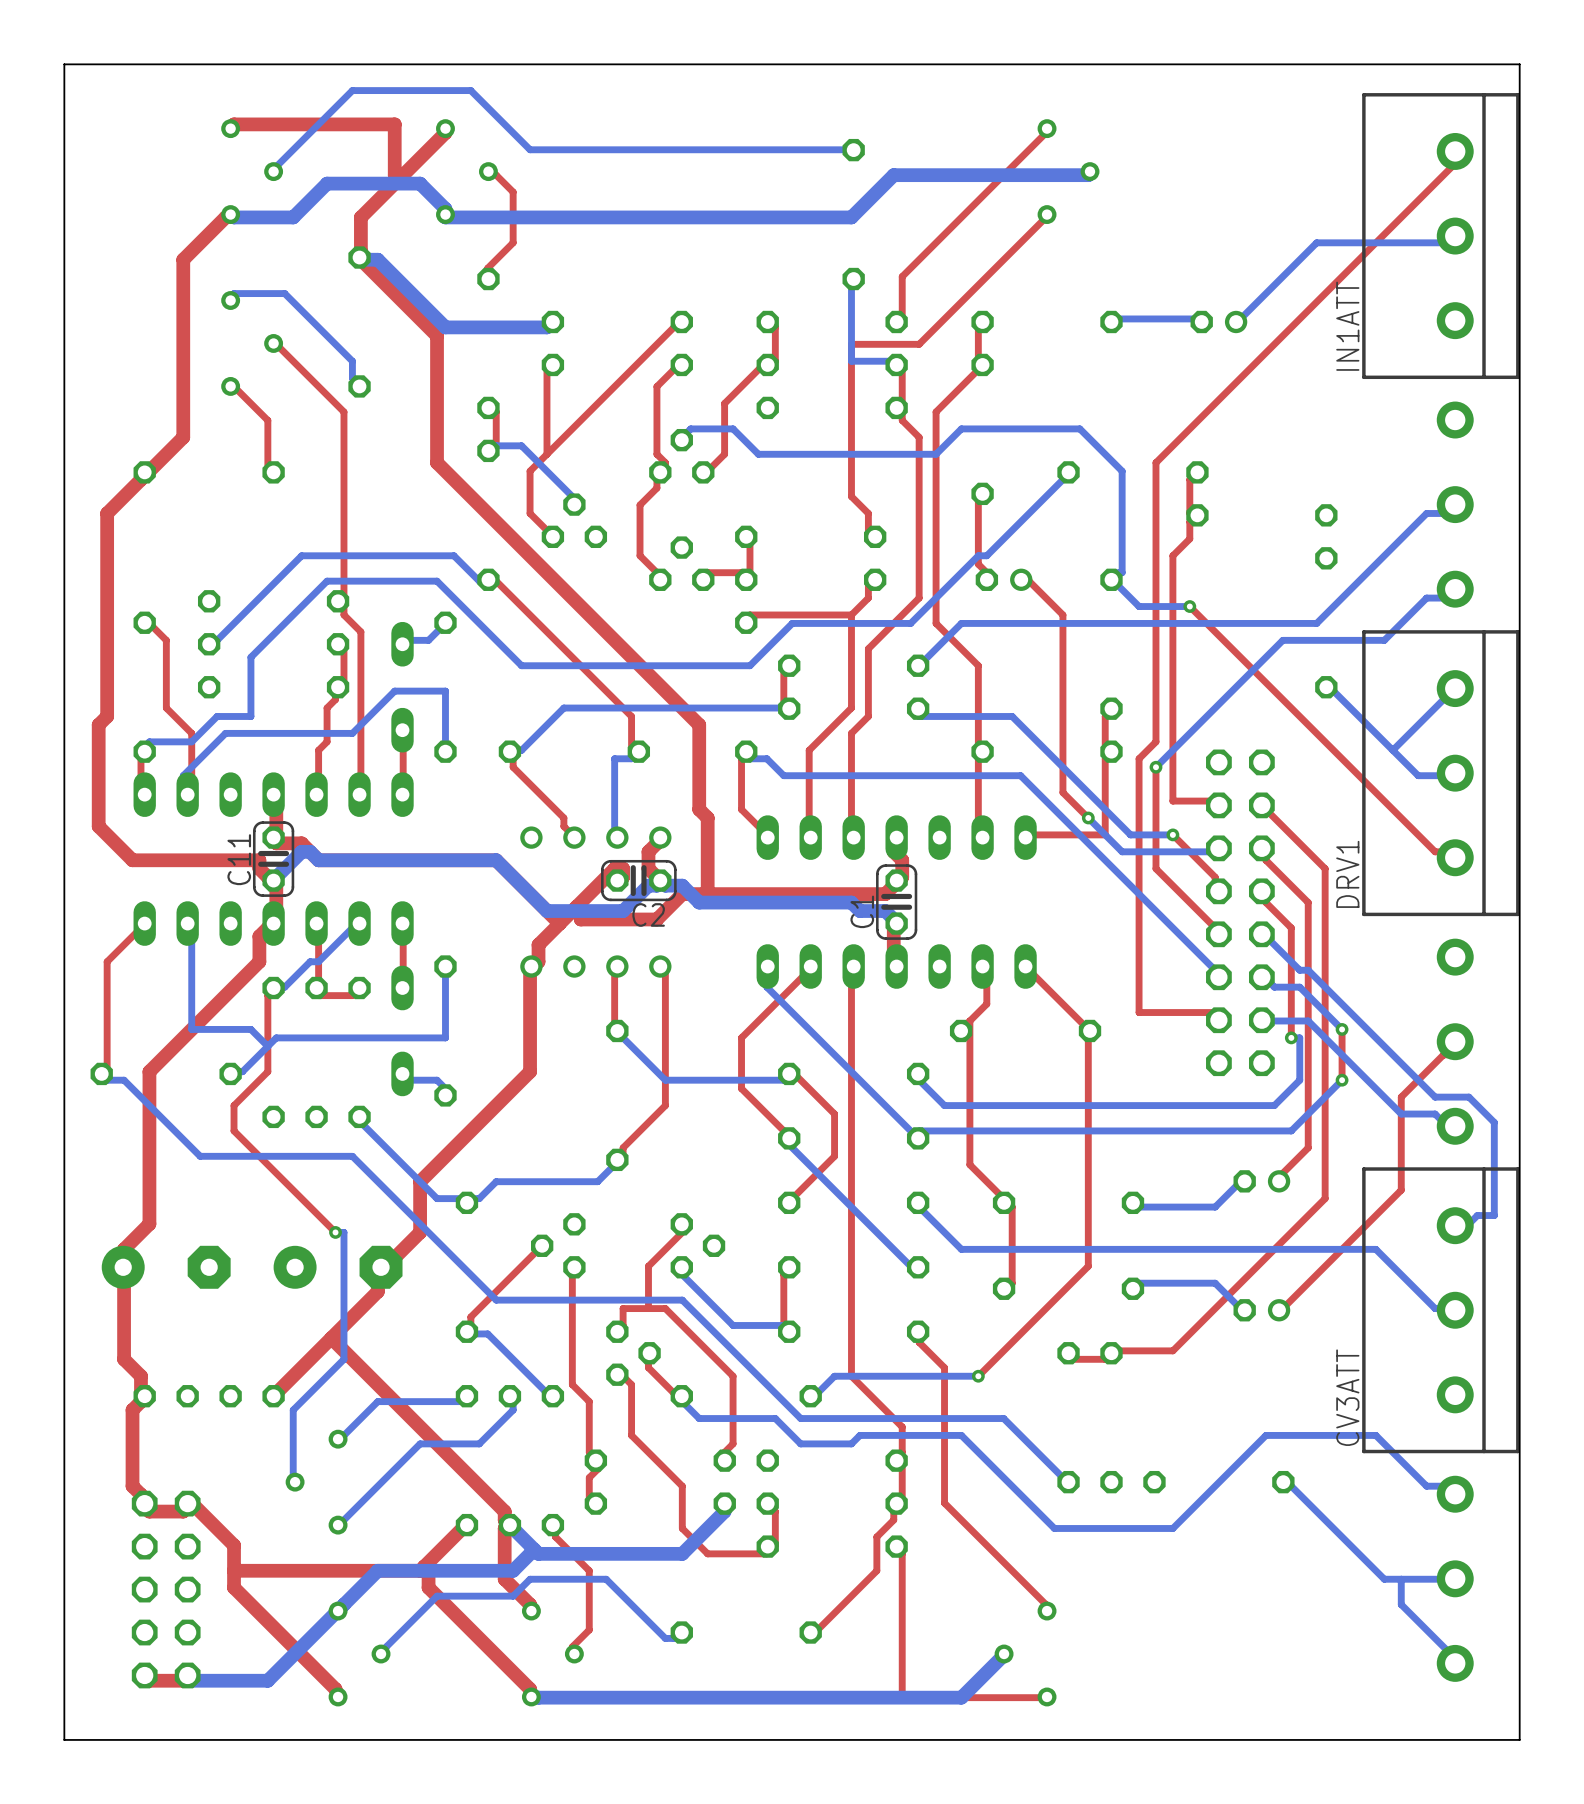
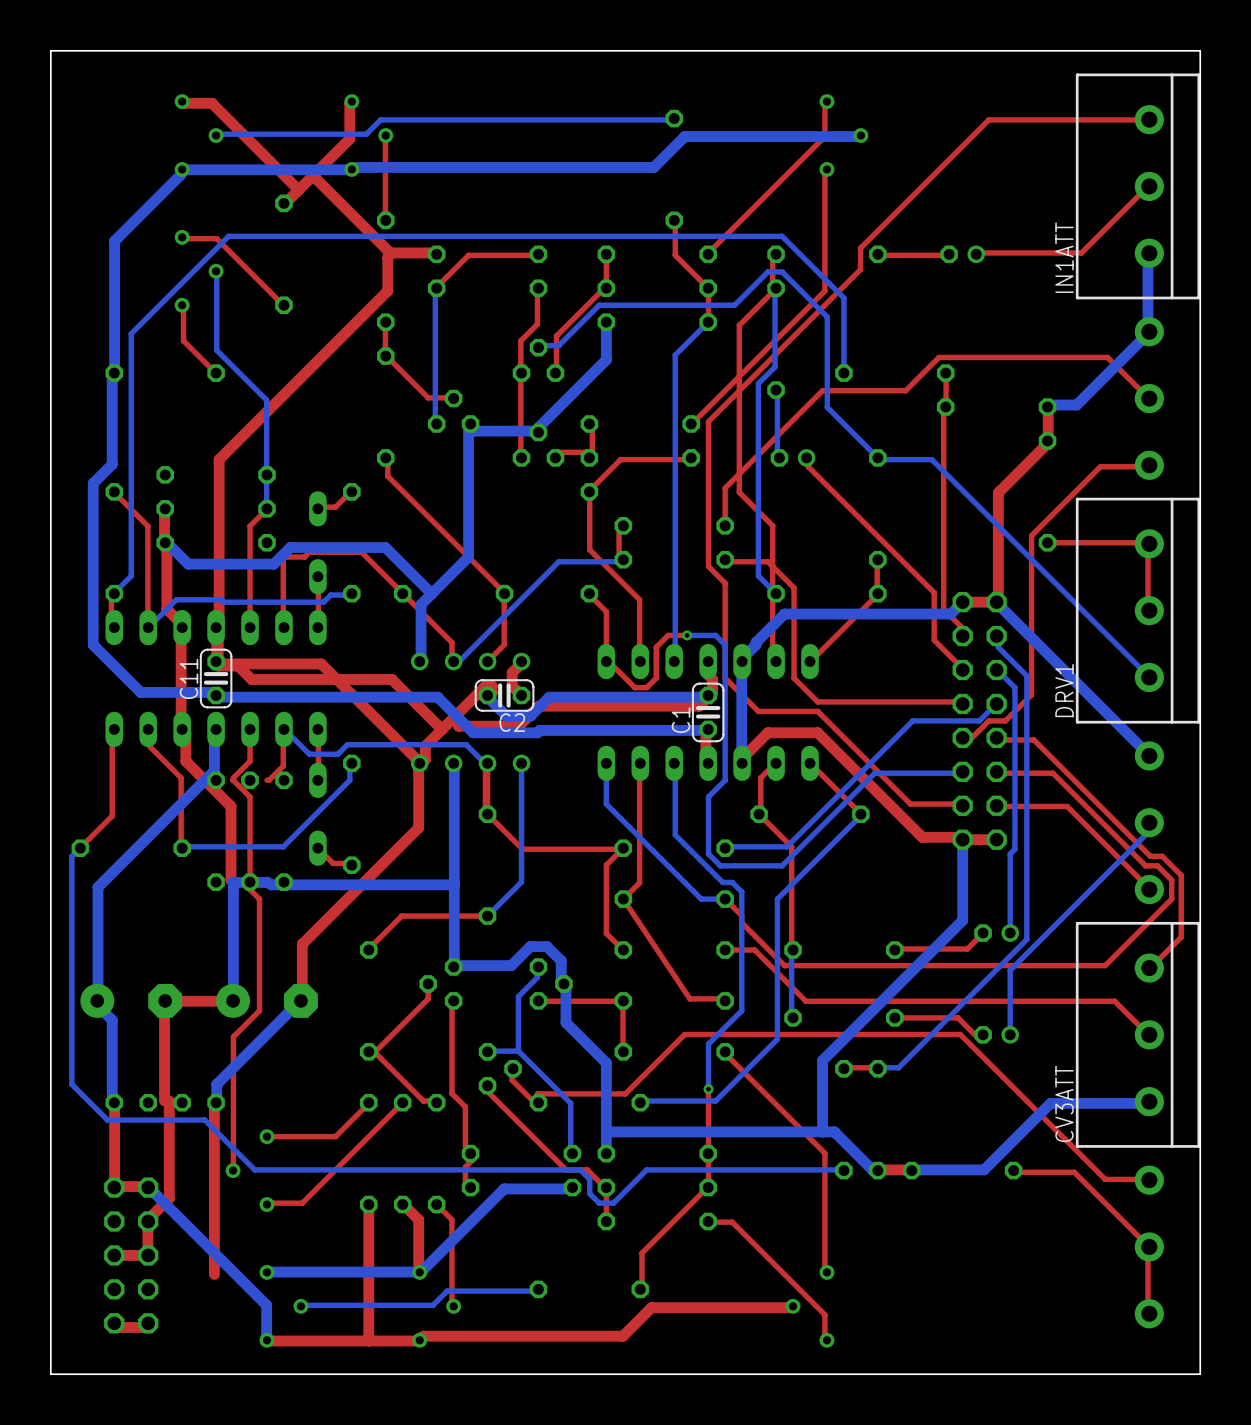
top track: (230, 128) (234, 124) (394, 124) (394, 175) (398, 179) -> (182, 101) (183, 103) (212, 103) (298, 190)
top track: (445, 128) (445, 132) (360, 217) (359, 257) (437, 335) (437, 462) (699, 724) (699, 809) (707, 817) (707, 894) -> (351, 101) (349, 103) (349, 138) (283, 203)
top track: (1047, 128) (1046, 132) (902, 276) (902, 318) (896, 321) -> (826, 101) (824, 103) (824, 136) (708, 254)
bottom track: (853, 150) (530, 149) (470, 90) (352, 90) (273, 171) -> (674, 118) (380, 119) (366, 134) (216, 135)
top track: (1455, 151) (1452, 158) (1452, 166) (1155, 462) (1155, 741) (1139, 758) (1139, 1012) (1215, 1012) (1218, 1020) -> (1149, 119) (988, 119) (860, 248) (860, 269) (708, 421) (708, 566) (725, 583) (725, 678) (758, 711) (817, 711) (910, 804) (962, 804) (962, 805)
top track: (488, 171) (496, 175) (513, 192) (513, 242) (487, 268) (488, 279) -> (385, 135) (385, 220)
bottom track: (1090, 171) (1088, 175) (893, 175) (851, 217) (445, 217) (445, 208) (420, 183) (327, 183) (293, 217) (234, 217) (230, 214) -> (860, 135) (684, 136) (653, 167) (182, 169) (181, 174) (114, 241) (112, 464) (93, 483) (93, 644) (140, 692) (212, 692) (216, 697) (437, 697) (473, 732) (708, 729)
top track: (230, 214) (183, 259) (183, 437) (149, 471) (144, 472) (140, 479) (107, 513) (107, 716) (98, 724) (98, 826) (132, 860) (259, 860) (259, 868) (273, 880) (276, 885) (276, 919) (259, 936) (259, 961) (149, 1071) (149, 1223) (124, 1249) (123, 1267) (124, 1359) (140, 1376) (140, 1393) (144, 1396) (132, 1410) (132, 1486) (140, 1494) (140, 1503) (144, 1503) (149, 1511) (183, 1511) (187, 1503) (191, 1503) (234, 1545) (234, 1587) (335, 1689) (338, 1696) -> (793, 1306) (651, 1307) (622, 1336) (423, 1336) (418, 1340) (267, 1340)
top track: (1047, 214) (919, 344) (851, 344) (851, 496) (868, 513) (868, 530) (875, 536) -> (826, 169) (824, 169) (824, 290) (691, 423)
top track: none -> (312, 175) (390, 252)
top track: none -> (1149, 186) (1081, 252) (976, 254)
bottom track: (1455, 236) (1452, 242) (1316, 242) (1236, 321) -> none
bottom track: (359, 257) (360, 259) (377, 259) (445, 327) (546, 327) (552, 321) -> none
top track: none -> (674, 220) (675, 255) (708, 288) (708, 322)
bottom track: (853, 279) (851, 285) (851, 361) (893, 361) (896, 364) -> none
top track: none -> (182, 237) (216, 238) (283, 305)
bottom track: (230, 300) (234, 293) (284, 293) (352, 361) (352, 378) (359, 386) -> none
top track: none -> (390, 252) (436, 254)
top track: none -> (390, 252) (387, 257) (387, 290) (219, 459) (219, 623) (216, 627) (216, 661) (221, 663) (321, 663) (419, 763)
bottom track: none -> (1149, 253) (1149, 331) (1076, 404) (1048, 404) (1047, 407)
top track: (681, 321) (673, 327) (530, 471) (530, 513) (552, 536) -> (538, 254) (468, 255) (436, 288)
top track: (767, 321) (775, 327) (775, 361) (767, 364) (766, 361) (724, 403) (724, 454) (707, 471) (703, 472) -> (606, 254) (606, 288) (556, 336) (555, 373)
top track: none -> (949, 254) (877, 254)
bottom track: (1201, 321) (1198, 318) (1113, 318) (1111, 321) -> none
top track: (273, 343) (343, 411) (343, 598) (338, 601) (343, 606) (343, 614) (360, 631) (359, 794) -> none
bottom track: none -> (216, 271) (216, 350) (266, 400) (267, 508)
top track: (552, 364) (546, 369) (546, 454) -> none
bottom track: none -> (436, 288) (436, 423)
top track: (681, 364) (673, 369) (656, 386) (656, 454) (665, 462) (665, 471) (660, 472) (656, 479) (656, 488) (640, 505) (640, 555) (656, 572) (660, 579) -> (538, 288) (537, 324) (520, 340) (521, 457)
top track: (896, 364) (902, 369) (902, 403) (896, 407) (902, 411) (902, 420) (919, 437) (919, 598) (868, 648) (868, 716) (851, 733) (851, 834) (853, 837) -> none
bottom track: none -> (776, 288) (775, 366) (758, 383) (758, 576) (776, 593)
top track: (230, 386) (234, 386) (267, 420) (267, 471) (273, 472) -> (182, 305) (183, 340) (216, 373)
top track: (488, 407) (496, 411) (496, 445) (488, 450) -> (385, 322) (385, 356) (428, 397) (453, 398)
bottom track: none -> (606, 322) (606, 359) (539, 426) (538, 432) (473, 431) (470, 423) (468, 423) (468, 557) (421, 604) (419, 661)
bottom track: none -> (708, 322) (675, 355) (674, 661)
bottom track: (681, 440) (690, 428) (733, 428) (758, 454) (936, 454) (961, 428) (1079, 428) (1122, 471) (1122, 572) (1113, 572) (1111, 579) (1139, 606) (1189, 606) -> (538, 347) (539, 345) (558, 345) (599, 305) (734, 305) (767, 271) (782, 271) (827, 317) (827, 407) (879, 459) (931, 459) (1149, 677)
bottom track: (488, 450) (496, 445) (521, 445) (572, 496) (574, 504) -> none
bottom track: (1068, 472) (986, 555) (978, 555) (910, 623) (792, 623) (749, 665) (521, 665) (437, 581) (327, 581) (250, 657) (250, 716) (217, 716) (191, 741) (149, 741) (140, 750) (144, 751) -> (843, 373) (843, 298) (782, 236) (228, 236) (131, 333) (131, 576) (114, 593)
top track: (1197, 472) (1189, 479) (1189, 513) (1197, 515) (1189, 521) (1189, 538) (1172, 555) (1172, 801) (1215, 801) (1218, 805) -> (945, 373) (946, 404) (943, 407) (943, 609) (962, 628) (962, 636)
top track: (982, 493) (978, 496) (978, 564) (986, 572) (986, 579) -> none
bottom track: none -> (776, 390) (777, 457) (779, 457)
top track: none -> (1149, 398) (1107, 357) (938, 357) (905, 390) (822, 390) (725, 488) (725, 525)
bottom track: (1455, 504) (1452, 505) (1443, 513) (1426, 513) (1316, 623) (961, 623) (918, 665) -> none
top track: none -> (1047, 407) (1048, 440) (1045, 445) (998, 492) (998, 597) (996, 602) (962, 602)
top track: (488, 579) (496, 581) (631, 716) (631, 750) (638, 751) -> (385, 457) (387, 459) (387, 476) (504, 592) (504, 644) (487, 661)
bottom track: (488, 579) (479, 581) (453, 555) (301, 555) (217, 640) (209, 644) -> none
top track: (875, 579) (868, 581) (868, 598) (851, 614) -> none
top track: (1021, 579) (1029, 581) (1062, 614) (1062, 792) (1088, 817) -> (806, 457) (808, 466) (934, 592) (934, 640) (962, 670)
bottom track: (1455, 589) (1452, 589) (1443, 598) (1426, 598) (1384, 640) (1282, 640) (1155, 767) -> none
top track: (1189, 606) (1435, 851) (1452, 851) (1455, 857) -> none
via: (1189, 606) -> none
top track: (851, 614) (851, 708) (809, 750) (810, 837) -> (691, 457) (689, 459) (620, 459) (589, 490) (589, 549) (639, 599) (640, 661)
top track: (851, 614) (749, 614) (746, 622) -> none
top track: (144, 622) (149, 623) (166, 640) (166, 708) (191, 733) (191, 792) (187, 794) -> (114, 491) (147, 526) (148, 627)
top track: none -> (351, 491) (335, 507) (318, 507) (317, 508)
bottom track: (445, 622) (428, 640) (403, 640) (402, 644) -> none
top track: none -> (165, 508) (166, 609) (181, 623) (182, 627) (181, 728) (185, 732) (185, 761) (231, 806) (231, 880) (233, 882)
top track: (338, 644) (343, 648) (343, 682) (338, 687) (335, 691) (335, 699) (327, 708) (327, 741) (318, 750) (318, 792) (316, 794) -> (267, 508) (250, 526) (250, 627)
bottom track: none -> (165, 542) (188, 564) (273, 564) (290, 547) (385, 547) (431, 593)
top track: none -> (1047, 542) (1147, 542) (1149, 610)
bottom track: (1326, 687) (1333, 691) (1418, 775) (1452, 775) (1455, 773) -> none
bottom track: (1455, 688) (1392, 750) -> none
bottom track: (789, 708) (563, 708) (521, 750) (509, 751) -> (623, 559) (622, 561) (558, 561) (459, 661) (453, 661)
bottom track: (918, 708) (919, 716) (1012, 716) (1130, 834) (1172, 834) -> none
top track: (1111, 708) (1105, 716) (1105, 750) (1111, 751) (1105, 758) (1105, 834) (1029, 834) (1025, 837) -> (877, 559) (877, 595) (809, 661)
bottom track: (445, 751) (445, 691) (394, 691) (352, 733) (225, 733) (183, 775) (183, 792) (187, 794) -> (351, 593) (330, 595) (323, 602) (223, 602) (221, 599) (176, 599) (148, 627)
top track: (509, 751) (513, 758) (513, 767) (563, 817) (563, 826) (574, 837) -> (283, 627) (283, 557) (304, 557) (309, 552) (361, 552) (451, 642) (451, 661) (453, 661)
bottom track: (638, 751) (631, 758) (614, 758) (614, 834) (617, 837) -> none
top track: (746, 751) (741, 758) (741, 809) (767, 837) -> (589, 593) (606, 611) (606, 661) (608, 661) (634, 687) (646, 687) (656, 678) (656, 647) (668, 635) (687, 635)
bottom track: (746, 751) (749, 758) (766, 758) (783, 775) (1020, 775) (1215, 970) (1218, 977) -> (687, 635) (715, 635) (725, 644) (725, 780) (708, 796) (708, 853) (720, 865) (782, 865) (874, 773) (962, 771)
bottom track: none -> (962, 602) (950, 614) (784, 614) (756, 642) (741, 661) (742, 763)
bottom track: none -> (996, 602) (1149, 755)
top track: (1155, 767) (1155, 868) (1215, 927) (1218, 934) -> (1149, 465) (1100, 466) (1031, 535) (1031, 694) (1005, 720) (988, 720) (972, 737) (962, 737)
via: (1155, 767) -> none
via: none -> (687, 635)
top track: (1261, 805) (1325, 868) (1325, 1198) (1172, 1350) (1113, 1350) (1105, 1359) (1071, 1359) (1068, 1353) -> (877, 1068) (843, 1068)
bottom track: none -> (996, 636) (998, 647) (1026, 675) (1026, 939) (898, 1067) (877, 1068)
bottom track: (1088, 817) (1122, 851) (1215, 851) (1218, 848) -> none
via: (1088, 817) -> none
top track: (1172, 834) (1215, 877) (1215, 885) (1218, 891) -> (725, 559) (725, 561) (767, 561) (794, 587) (794, 678) (817, 701) (962, 701) (962, 703)
via: (1172, 834) -> none
top track: (1261, 848) (1265, 851) (1265, 860) (1308, 902) (1308, 1147) (1282, 1173) (1279, 1181) -> none
bottom track: none -> (996, 670) (1014, 687) (1014, 849) (1010, 853) (1010, 933)
bottom track: (273, 880) (301, 851) (310, 851) (318, 860) (496, 860) (546, 911) (623, 911) (648, 885) (656, 885) (660, 880) (665, 885) (682, 885) (699, 902) (851, 902) (859, 911) (885, 911) (896, 923) -> none
bottom track: none -> (708, 695) (706, 697) (549, 697) (530, 716) (506, 716) (487, 695)
top track: (1261, 891) (1265, 894) (1265, 902) (1291, 927) (1291, 1037) -> none
top track: (144, 923) (107, 961) (107, 1071) (101, 1073) -> (114, 729) (112, 730) (112, 815) (80, 848)
top track: none -> (148, 729) (150, 730) (150, 747) (181, 777) (182, 848)
bottom track: (187, 923) (191, 927) (191, 1029) (250, 1029) (267, 1046) -> none
bottom track: none -> (216, 729) (214, 730) (214, 770) (97, 887) (97, 1000) (97, 1006) (112, 1020) (112, 1101) (114, 1102)
top track: (316, 923) (318, 927) (318, 987) (316, 988) (318, 995) (352, 995) (359, 988) -> (250, 729) (250, 761) (233, 780) (250, 796) (250, 889) (259, 899) (259, 1010) (233, 1036) (233, 1170)
top track: none -> (283, 729) (283, 766) (267, 780)
bottom track: (359, 923) (352, 927) (318, 961) (310, 961) (284, 987) (273, 988) -> (283, 729) (309, 754) (337, 754) (347, 744) (466, 744) (482, 761) (487, 761) (487, 763)
top track: none -> (996, 737) (998, 739) (1033, 739) (1150, 856) (1162, 856) (1181, 875) (1181, 937) (1149, 968)
bottom track: (1261, 934) (1299, 970) (1308, 970) (1435, 1097) (1468, 1097) (1494, 1122) (1494, 1215) (1477, 1215) (1468, 1223) (1455, 1225) -> none
bottom track: (445, 966) (445, 1037) (276, 1037) (242, 1071) (234, 1071) (230, 1073) -> (351, 763) (349, 763) (349, 780) (283, 846) (182, 848)
bottom track: none -> (453, 763) (453, 966) (511, 965) (530, 946) (546, 946) (561, 960) (561, 979) (565, 984) (565, 1022) (606, 1063) (606, 1153)
top track: (660, 966) (665, 970) (665, 1105) (623, 1147) (623, 1156) (617, 1159) -> (368, 950) (401, 916) (487, 916)
bottom track: (767, 966) (766, 987) (918, 1138) (919, 1130) (1291, 1130) (1342, 1080) -> (606, 763) (606, 804) (701, 899) (725, 899)
top track: (810, 966) (741, 1037) (741, 1088) (789, 1138) -> (640, 763) (639, 882) (623, 899) (689, 998) (725, 998) (725, 1000)
top track: (853, 966) (851, 970) (851, 1376) (902, 1426) (902, 1452) (896, 1460) (902, 1460) (902, 1503) (896, 1503) (893, 1520) (876, 1536) (876, 1570) (817, 1629) (810, 1632) -> (708, 1089) (708, 1187) (642, 1253) (642, 1288) (640, 1289)
bottom track: none -> (674, 763) (675, 834) (722, 882) (732, 882) (741, 891) (741, 1010) (708, 1044) (708, 1089)
top track: none -> (742, 763) (744, 756) (767, 732) (817, 732) (922, 837) (996, 839)
top track: (982, 966) (986, 970) (986, 1004) (961, 1030) -> (776, 763) (760, 777) (760, 813) (759, 814) (791, 846) (793, 950)
top track: (1025, 966) (1090, 1030) (1088, 1037) (1088, 1266) (978, 1376) -> (809, 763) (860, 814)
top track: none -> (996, 771) (1052, 773) (1145, 865) (1157, 865) (1171, 880) (1171, 899) (1105, 965) (784, 965) (741, 922) (741, 915) (725, 899)
bottom track: (1261, 977) (1274, 987) (1299, 987) (1342, 1029) -> none
top track: (273, 988) (267, 995) (267, 1071) (234, 1105) (234, 1130) (335, 1232) -> none
top track: (969, 1020) (969, 1164) (1003, 1198) (1004, 1202) (1012, 1207) (1012, 1283) (1004, 1288) -> none
top track: none -> (996, 805) (1067, 806) (1149, 889)
bottom track: (1261, 1020) (1308, 1020) (1401, 1114) (1435, 1114) (1443, 1122) (1452, 1122) (1455, 1126) -> none
top track: (1342, 1029) (1342, 1080) -> none
via: (1342, 1029) -> none
bottom track: (617, 1030) (665, 1080) (783, 1080) (789, 1073) -> none
bottom track: (1291, 1037) (1299, 1037) (1299, 1080) (1274, 1105) (944, 1105) (919, 1080) (918, 1073) -> (996, 703) (979, 720) (912, 720) (786, 846) (725, 848)
via: (1291, 1037) -> none
top track: (1455, 1041) (1452, 1046) (1452, 1054) (1443, 1054) (1401, 1097) (1401, 1190) (1279, 1310) -> none
bottom track: none -> (1149, 822) (1147, 832) (1010, 970) (1010, 1034)
top track: (530, 1048) (530, 1071) (420, 1181) (420, 1232) (386, 1266) (381, 1267) (377, 1274) (377, 1291) (273, 1396) -> (418, 827) (302, 944) (300, 1000)
bottom track: none -> (962, 839) (962, 920) (822, 1060) (822, 1131)
bottom track: (101, 1073) (107, 1080) (124, 1080) (200, 1156) (352, 1156) (496, 1300) (682, 1300) (800, 1418) (1003, 1418) (1068, 1482) -> (80, 848) (71, 856) (71, 1084) (107, 1120) (204, 1120) (254, 1169) (580, 1169) (589, 1179) (589, 1193) (599, 1203) (613, 1203) (646, 1169) (843, 1170)
top track: none -> (317, 848) (333, 863) (349, 863) (351, 865)
bottom track: (402, 1073) (403, 1080) (437, 1080) (445, 1088) (445, 1095) -> none
top track: (789, 1073) (792, 1071) (834, 1114) (834, 1156) (789, 1202) -> (487, 763) (487, 814) (522, 849) (623, 848) (606, 865) (606, 933) (623, 950)
via: (1342, 1080) -> none
bottom track: (359, 1116) (360, 1122) (437, 1198) (462, 1198) (466, 1202) (470, 1198) (479, 1198) (496, 1181) (597, 1181) (617, 1159) -> (521, 763) (521, 882) (487, 916)
bottom track: none -> (454, 884) (271, 884) (267, 882) (233, 882) (233, 1000)
bottom track: (789, 1138) (783, 1139) (910, 1266) (918, 1267) -> none
top track: none -> (983, 933) (967, 948) (894, 950)
bottom track: (1244, 1181) (1240, 1181) (1215, 1207) (1139, 1207) (1132, 1202) -> none
top track: none -> (725, 950) (754, 950) (805, 1001) (1114, 1001) (1149, 1034)
bottom track: (918, 1202) (919, 1207) (961, 1249) (1375, 1249) (1435, 1308) (1455, 1310) -> none
bottom track: none -> (793, 950) (793, 1017)
top track: (681, 1224) (682, 1232) (648, 1266) (648, 1308) -> none
bottom track: none -> (538, 966) (537, 977) (518, 996) (518, 1051)
bottom track: (335, 1232) (343, 1232) (343, 1359) (293, 1410) (293, 1477) (295, 1482) -> none
via: (335, 1232) -> none
top track: (542, 1245) (470, 1317) (470, 1325) (466, 1331) -> (428, 983) (428, 998) (375, 1051) (368, 1051) (368, 1053) (375, 1053) (423, 1101) (435, 1101) (436, 1102)
top track: none -> (233, 1000) (164, 1001) (164, 1101)
bottom track: none -> (300, 1000) (216, 1084) (216, 1102)
bottom track: (681, 1267) (682, 1274) (733, 1325) (783, 1325) (789, 1331) -> none
top track: (789, 1267) (783, 1274) (783, 1325) (789, 1331) -> (538, 1000) (623, 1000) (623, 1051)
top track: none -> (894, 1017) (957, 1017) (974, 1034) (983, 1034)
bottom track: (1132, 1288) (1139, 1283) (1215, 1283) (1240, 1308) (1244, 1310) -> none
bottom track: none -> (518, 1051) (570, 1103) (570, 1153) (572, 1153)
bottom track: none -> (518, 1051) (487, 1051)
bottom track: (466, 1331) (470, 1333) (487, 1333) (546, 1393) (552, 1396) -> none
top track: (617, 1331) (623, 1325) (623, 1308) (665, 1308) (733, 1376) (733, 1443) (724, 1452) (724, 1460) -> none
top track: (918, 1331) (919, 1342) (944, 1367) (944, 1503) (1046, 1604) (1047, 1611) -> (725, 1051) (824, 1153) (824, 1272) (826, 1272)
top track: (331, 1338) (504, 1511) (504, 1520) (509, 1525) (504, 1528) (504, 1579) (530, 1604) (531, 1611) -> (402, 1204) (418, 1219) (419, 1272)
top track: (617, 1374) (623, 1376) (631, 1384) (631, 1435) (682, 1486) (682, 1528) (707, 1553) (766, 1553) (767, 1546) (775, 1545) (775, 1511) (767, 1503) -> (487, 1085) (487, 1091) (565, 1169) (587, 1169) (606, 1187) (606, 1221)
bottom track: (978, 1376) (834, 1376) (817, 1393) (810, 1396) -> (860, 814) (777, 899) (777, 1039) (715, 1101) (642, 1101) (640, 1102)
via position: (978, 1376) -> (708, 1089)
top track: none -> (169, 1101) (169, 1198) (147, 1222) (148, 1255) (114, 1255)
bottom track: none -> (1149, 1101) (1147, 1103) (1050, 1103) (984, 1169) (911, 1170)
top track: none -> (114, 1102) (114, 1187) (148, 1187)
top track: none -> (216, 1102) (214, 1103) (214, 1274)
top track: none -> (368, 1102) (335, 1136) (267, 1136)
bottom track: (466, 1396) (462, 1401) (377, 1401) (338, 1439) -> none
top track: none -> (402, 1102) (302, 1203) (267, 1204)
bottom track: (509, 1396) (513, 1401) (513, 1410) (479, 1443) (420, 1443) (338, 1525) -> none
top track: none -> (538, 1102) (537, 1093) (625, 1093) (684, 1034) (960, 1034) (1105, 1179) (1149, 1180)
bottom track: (681, 1396) (682, 1401) (699, 1418) (775, 1418) (800, 1443) (851, 1443) (859, 1435) (961, 1435) (1054, 1528) (1172, 1528) (1265, 1435) (1375, 1435) (1426, 1486) (1452, 1486) (1455, 1494) -> none
bottom track: none -> (606, 1131) (834, 1131) (872, 1169) (877, 1170)
top track: none -> (911, 1170) (877, 1170)
top track: none -> (1013, 1170) (1014, 1172) (1074, 1172) (1149, 1246) (1149, 1313)
bottom track: (1283, 1482) (1291, 1486) (1384, 1579) (1455, 1578) -> none
bottom track: none -> (148, 1187) (266, 1305) (267, 1340)
bottom track: (724, 1503) (724, 1511) (682, 1553) (538, 1553) (509, 1525) -> (572, 1187) (504, 1188) (421, 1272) (267, 1272)
top track: (466, 1525) (420, 1570) (234, 1570) -> (368, 1204) (368, 1340)
top track: (552, 1525) (555, 1528) (555, 1536) (589, 1570) (589, 1629) (572, 1646) (574, 1654) -> (436, 1204) (451, 1219) (451, 1305) (453, 1306)
top track: (896, 1546) (902, 1553) (902, 1697) (1047, 1696) -> (708, 1221) (732, 1222) (824, 1314) (824, 1338) (826, 1340)
bottom track: (534, 1549) (513, 1570) (377, 1570) (267, 1680) (191, 1680) (187, 1675) -> none
top track: (424, 1566) (428, 1570) (428, 1587) (530, 1689) (531, 1696) -> none
bottom track: (1401, 1579) (1401, 1604) (1452, 1655) (1455, 1663) -> none
bottom track: (681, 1632) (673, 1638) (665, 1638) (606, 1579) (530, 1579) (513, 1596) (437, 1596) (381, 1654) -> (538, 1289) (537, 1291) (447, 1291) (432, 1305) (300, 1306)
bottom track: (1004, 1654) (961, 1697) (531, 1696) -> none

